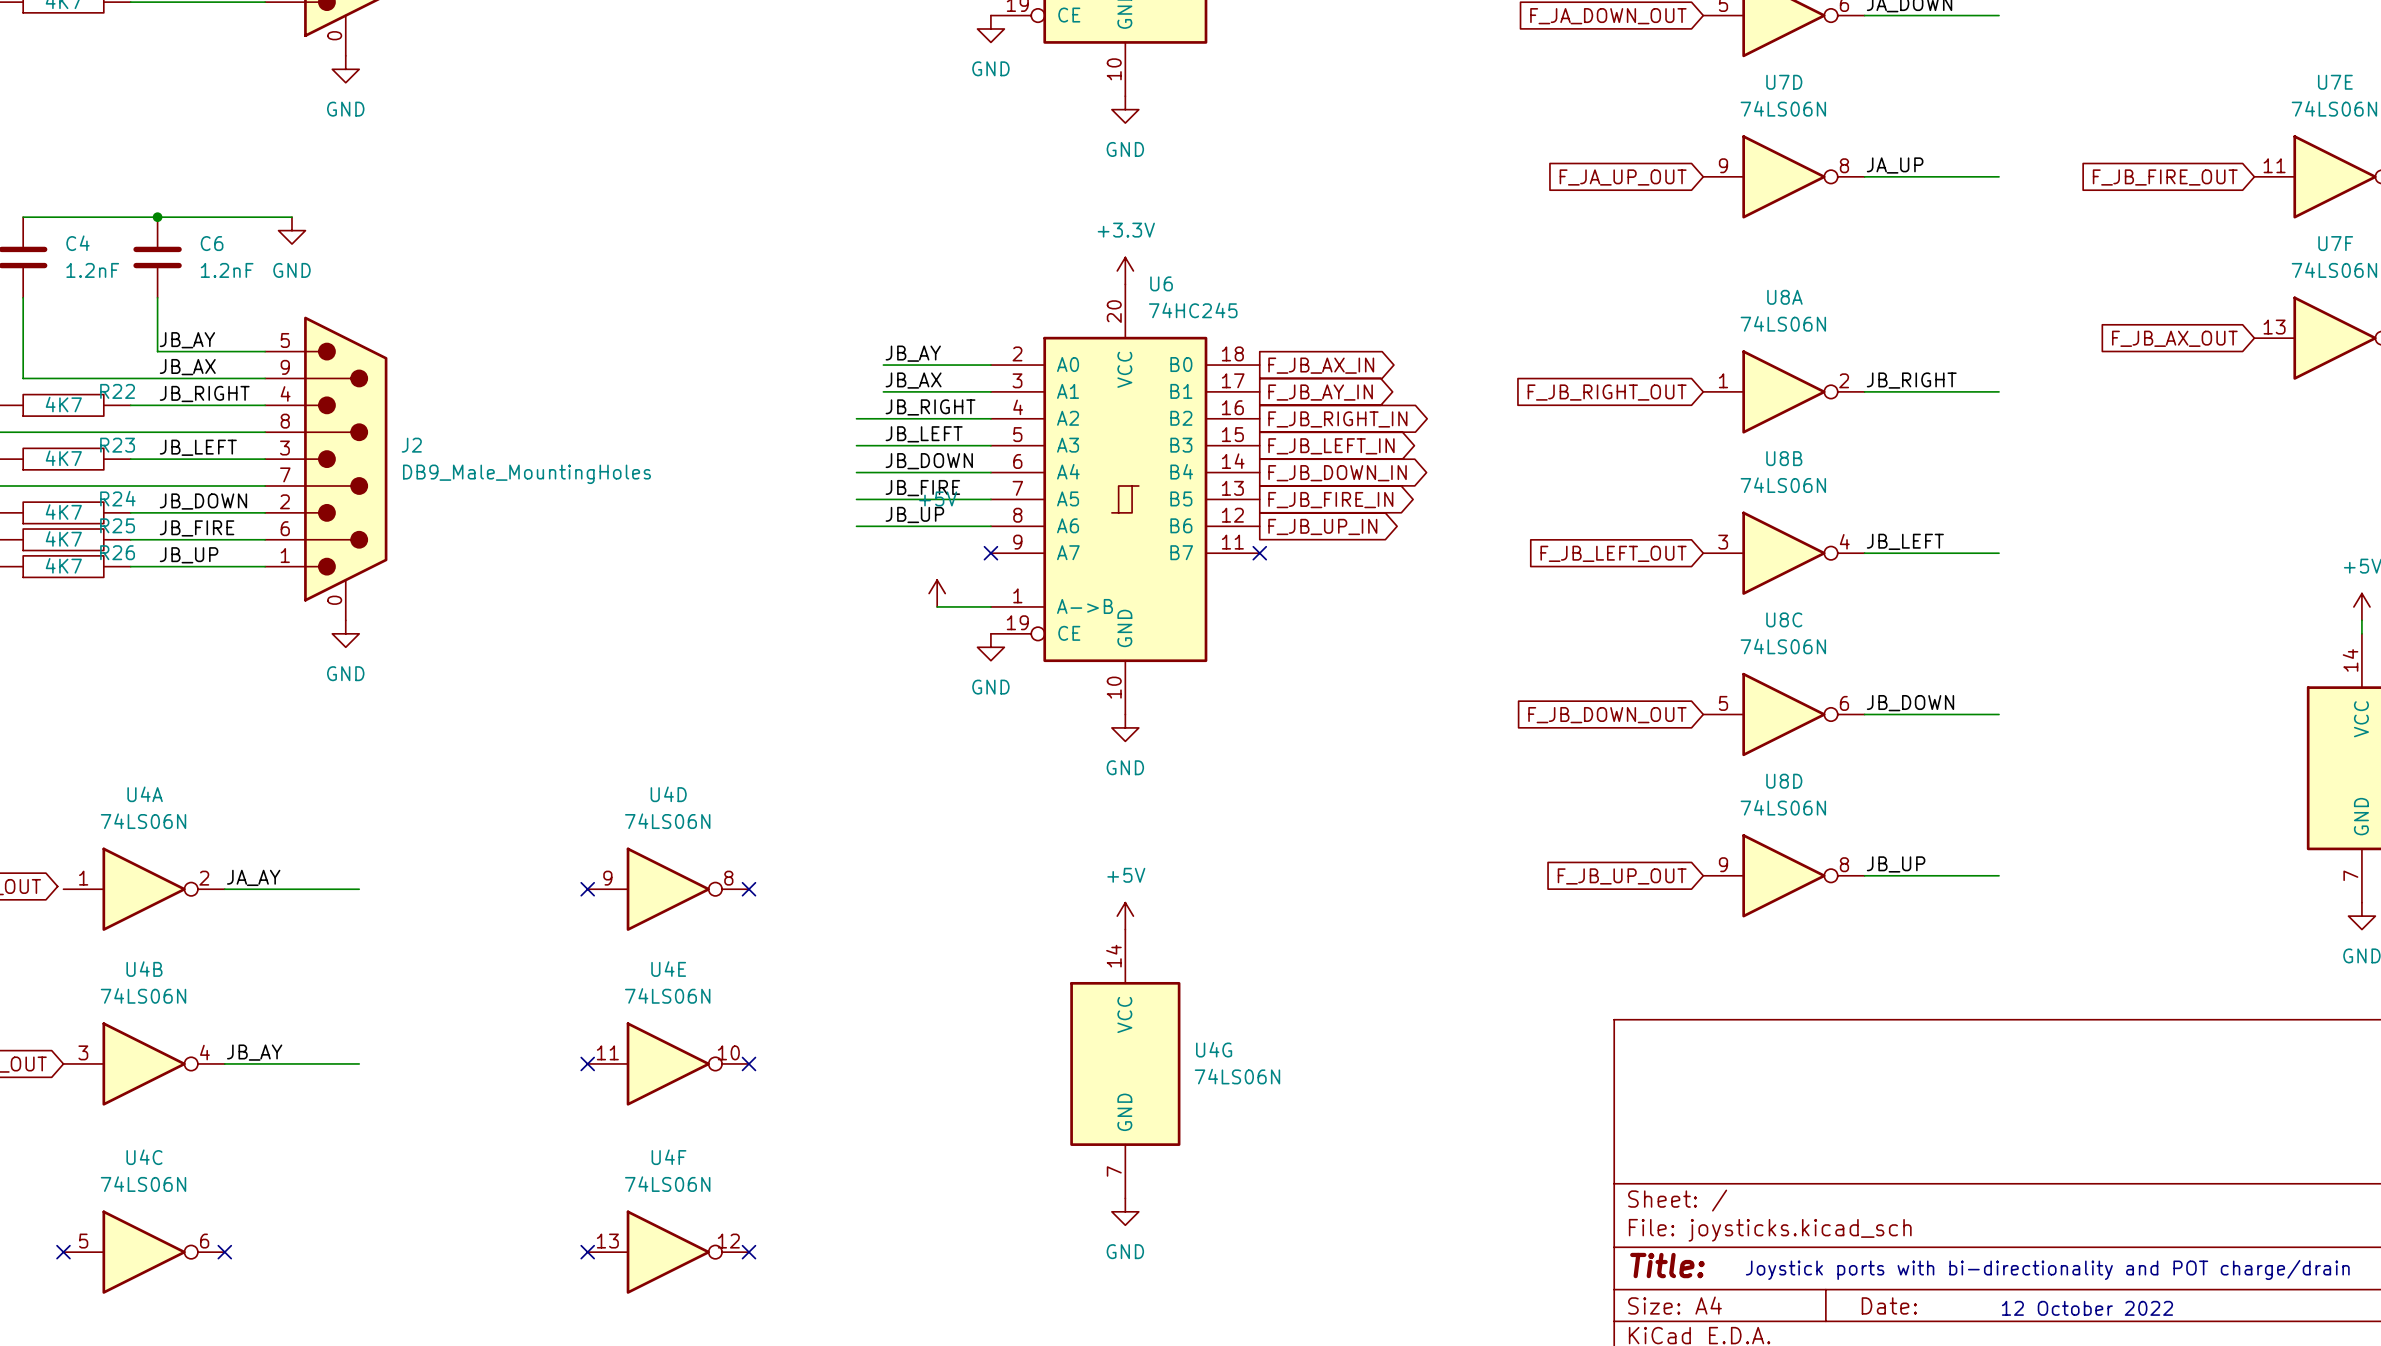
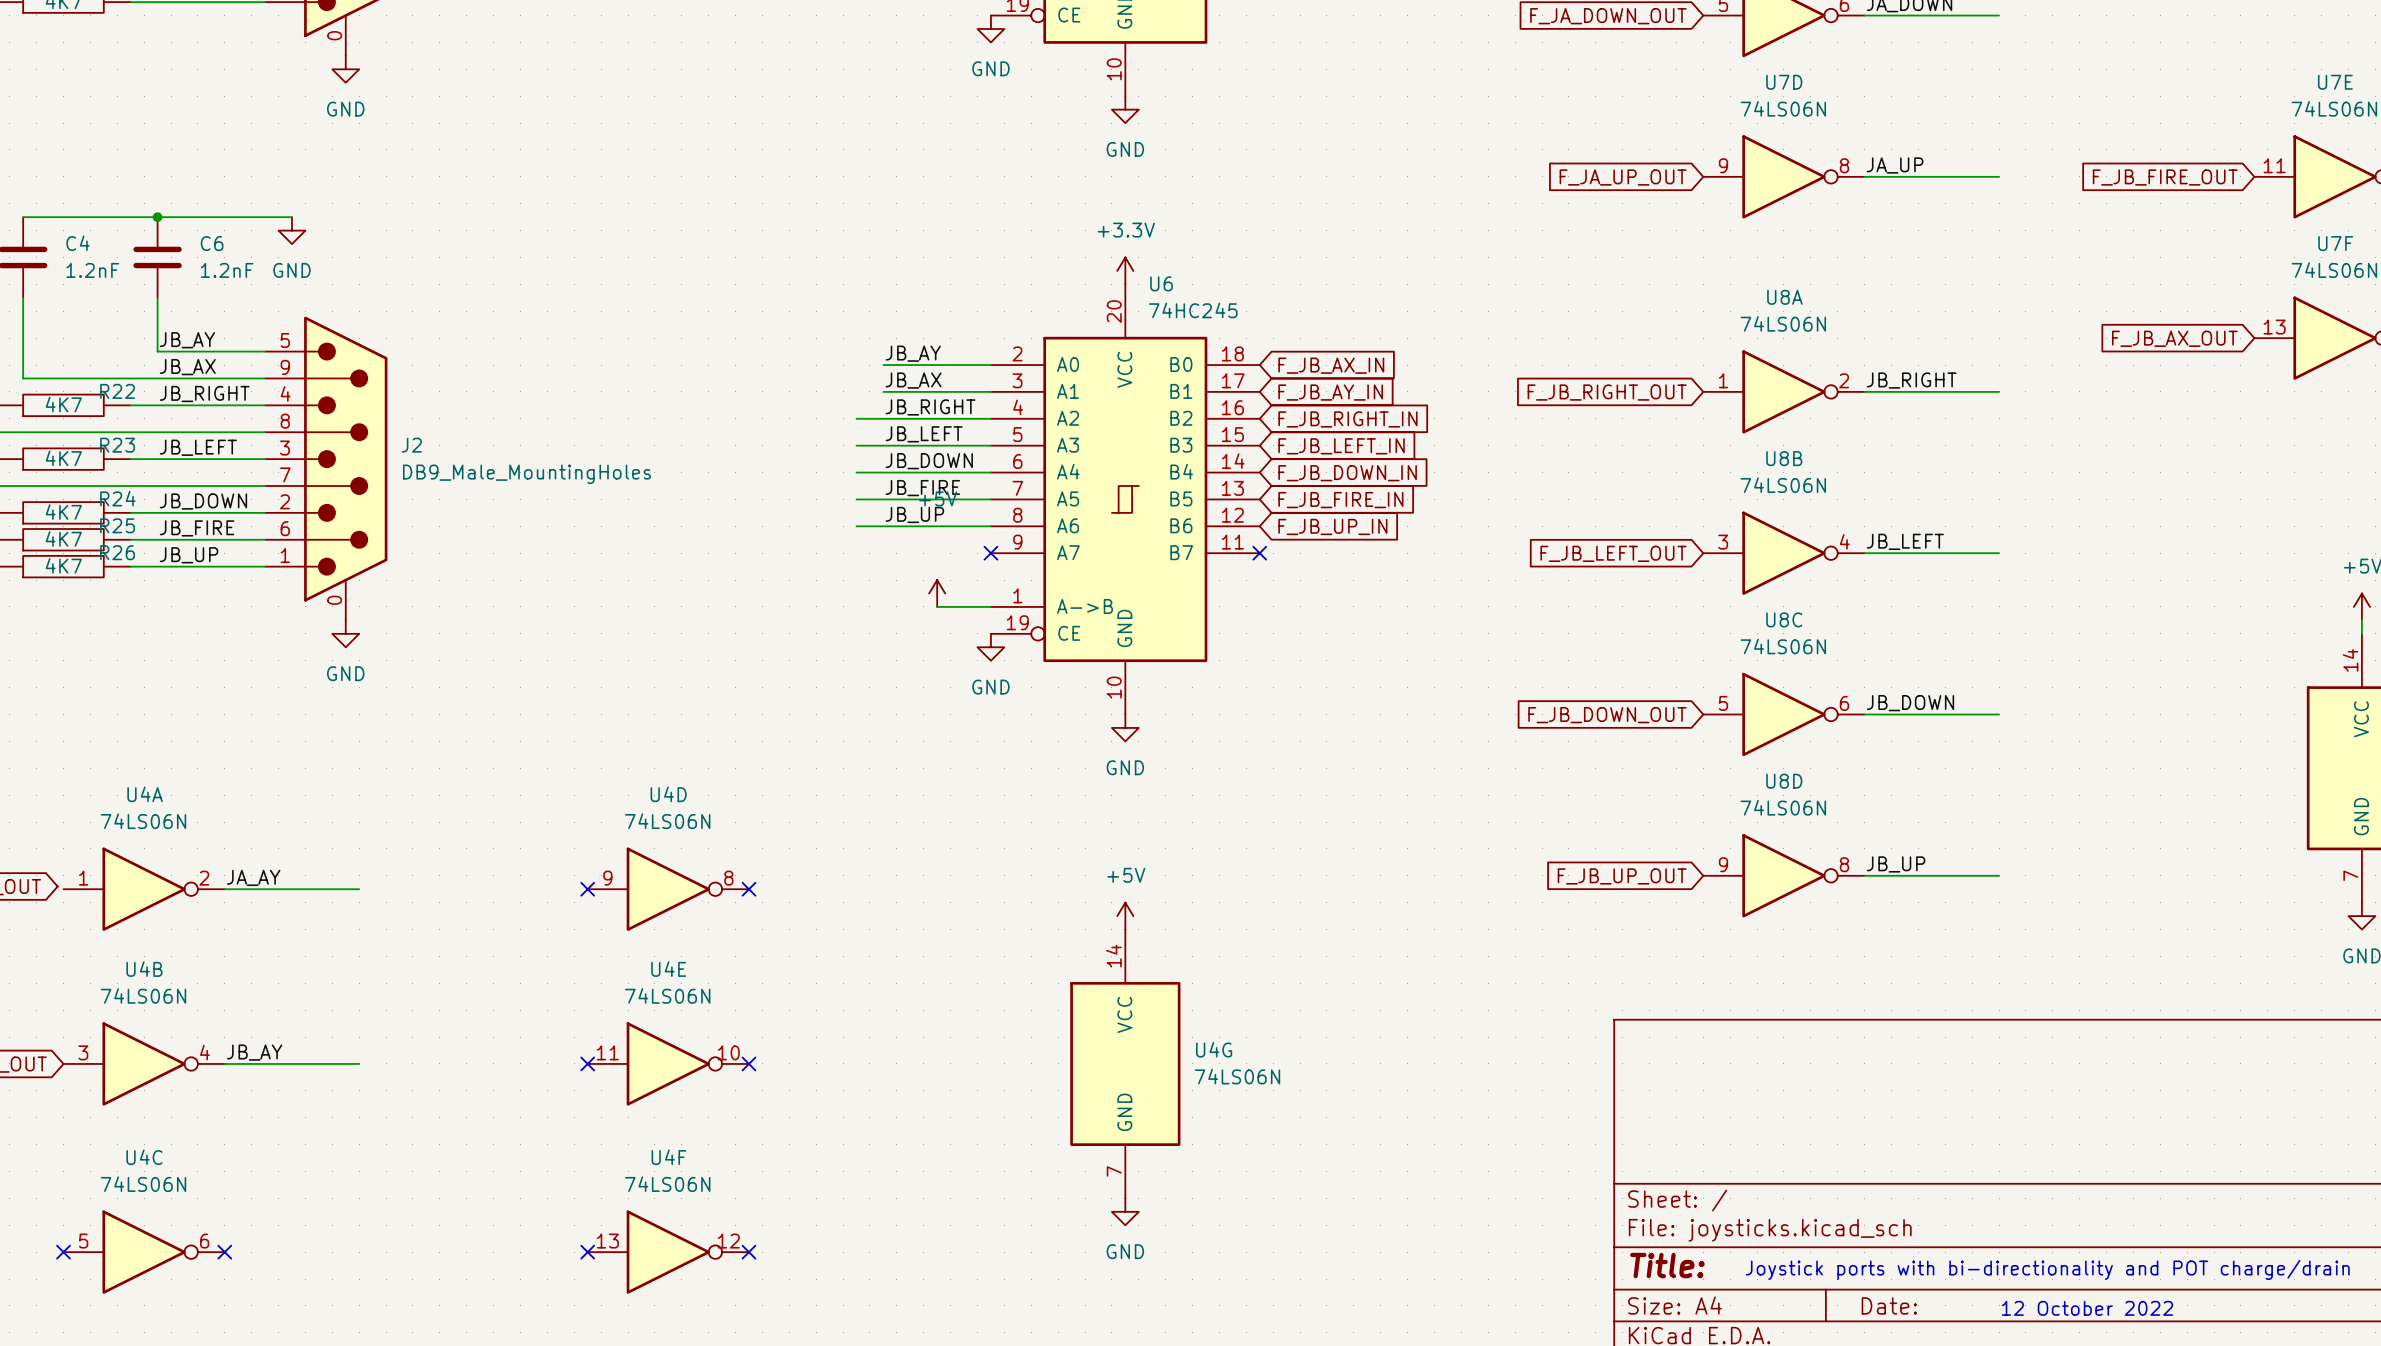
global label shape: output (1321, 365) -> input (1331, 365)
global label shape: output (1320, 392) -> input (1330, 392)
global label shape: output (1337, 419) -> input (1347, 419)
global label shape: output (1331, 446) -> input (1341, 446)
global label shape: output (1337, 473) -> input (1347, 473)
global label shape: output (1330, 500) -> input (1340, 500)
global label shape: output (1322, 526) -> input (1332, 526)

